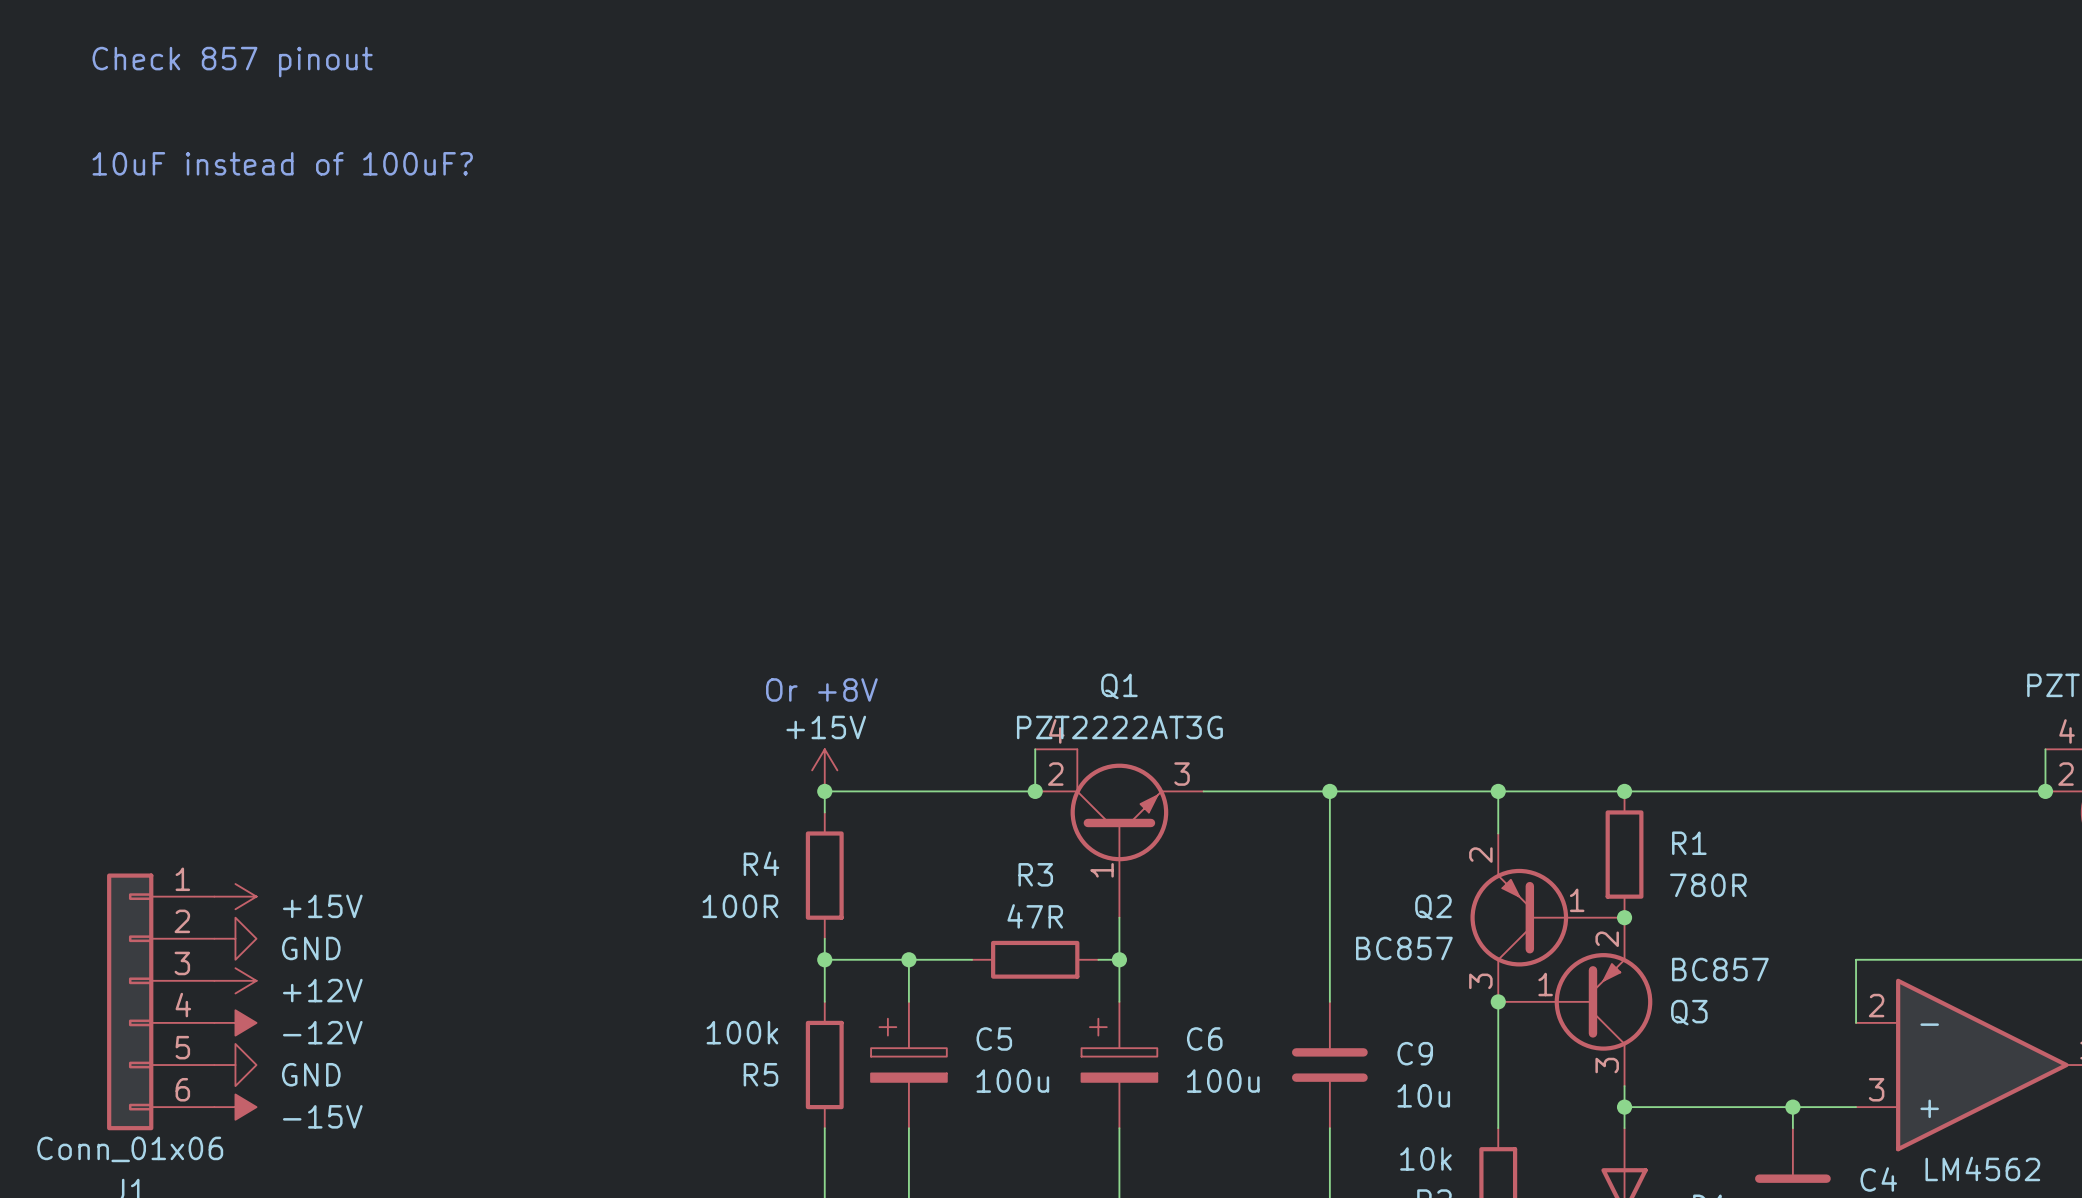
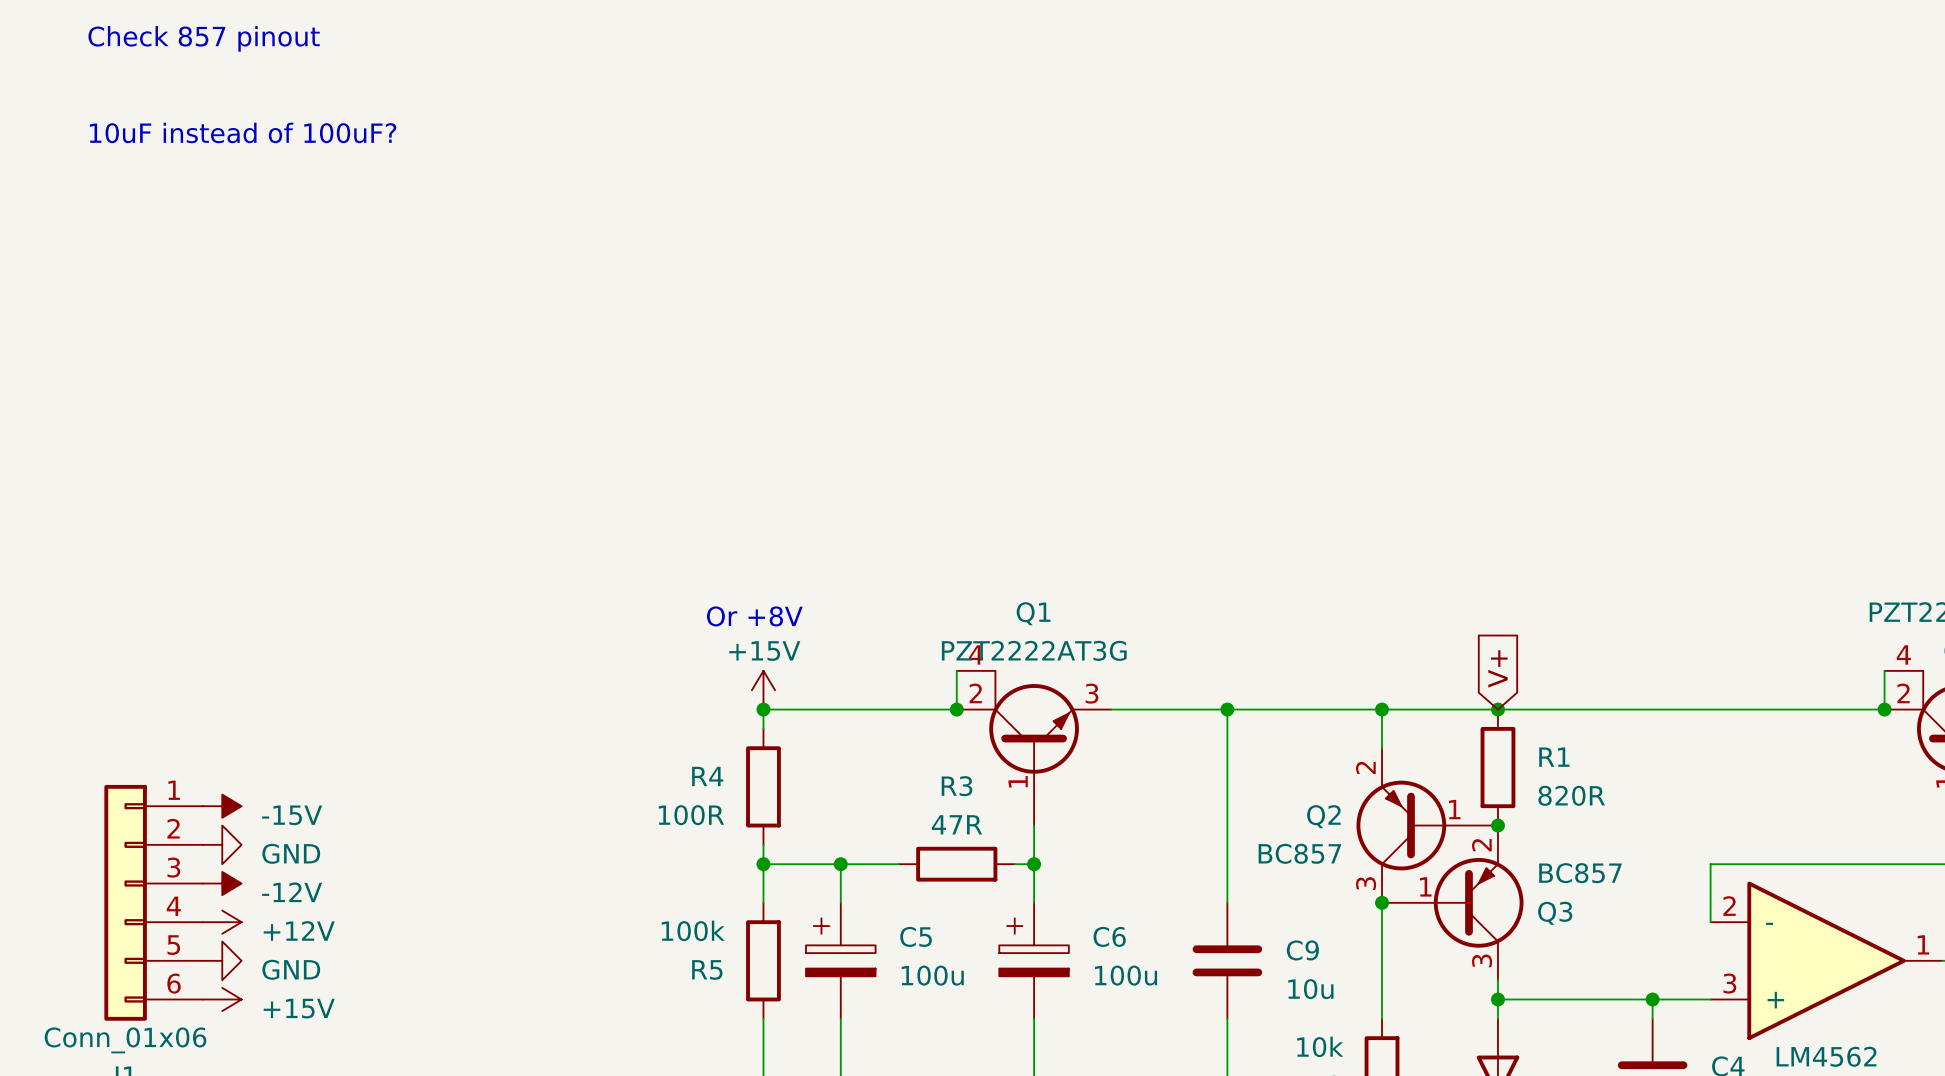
global label: none -> V+ (1497, 668)
R1 value: 780R (1708, 885) -> 820R (1571, 795)
power symbol: +15V (235, 896) -> -15V (222, 806)
power symbol: +12V (235, 980) -> -12V (222, 883)
power symbol: -12V (235, 1022) -> +12V (222, 922)
power symbol: -15V (235, 1107) -> +15V (222, 999)

